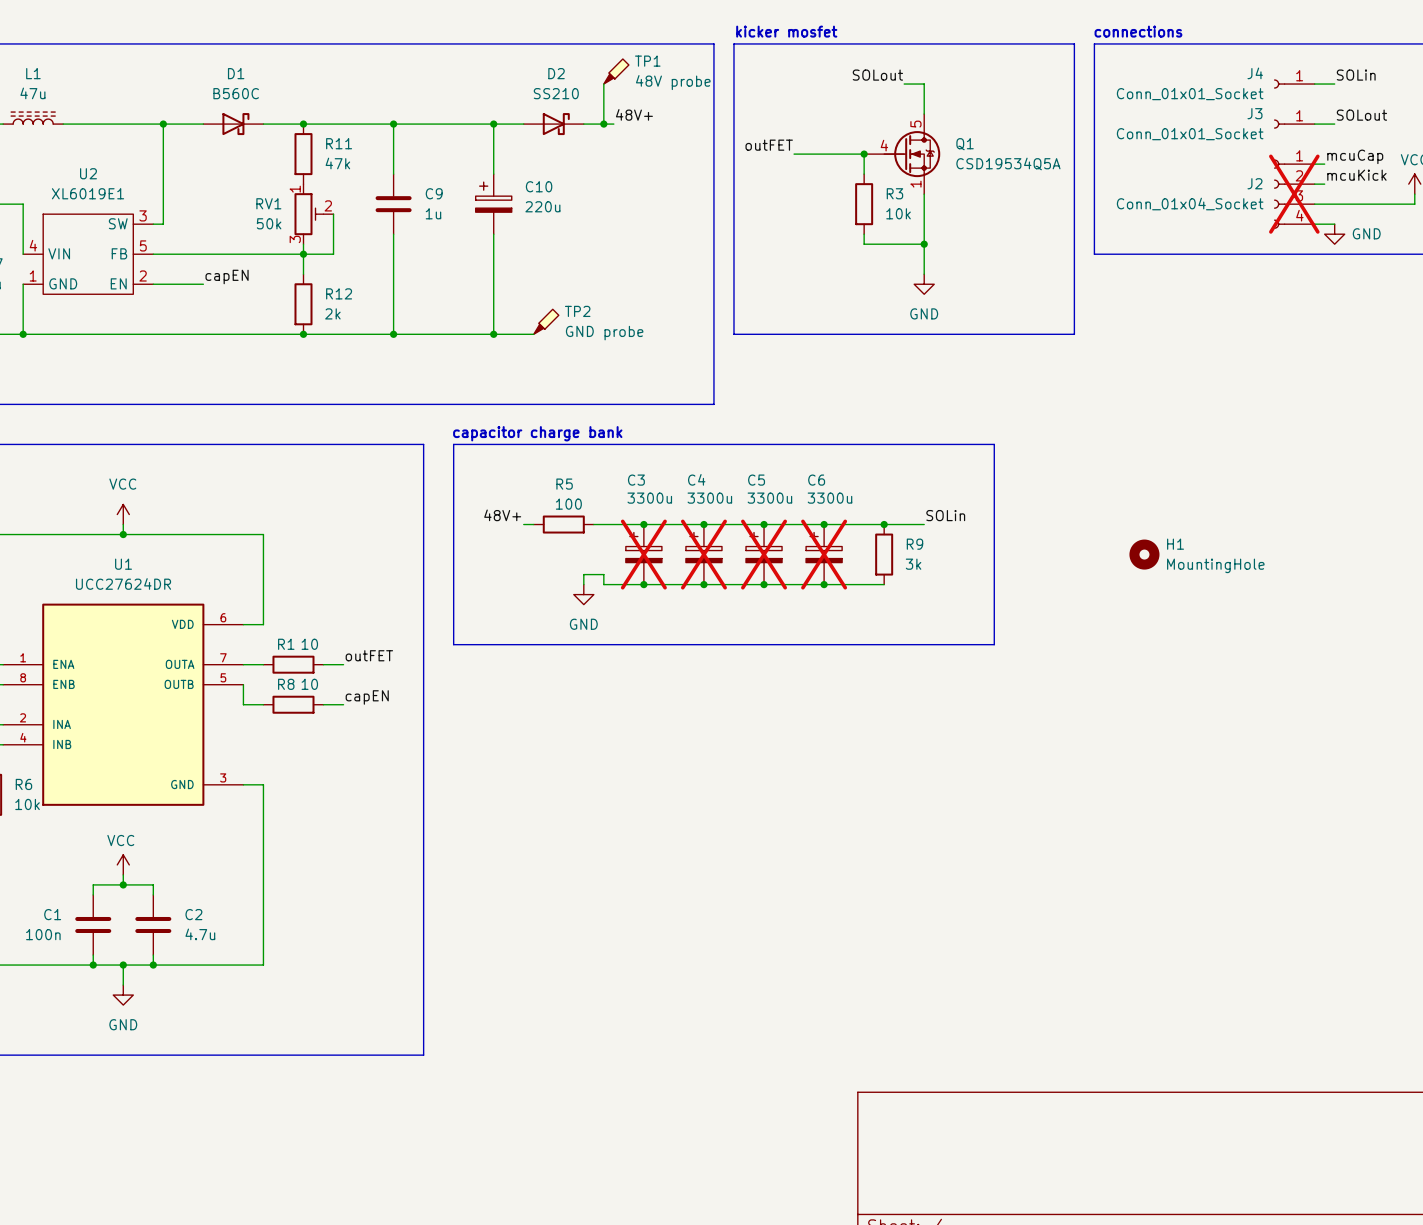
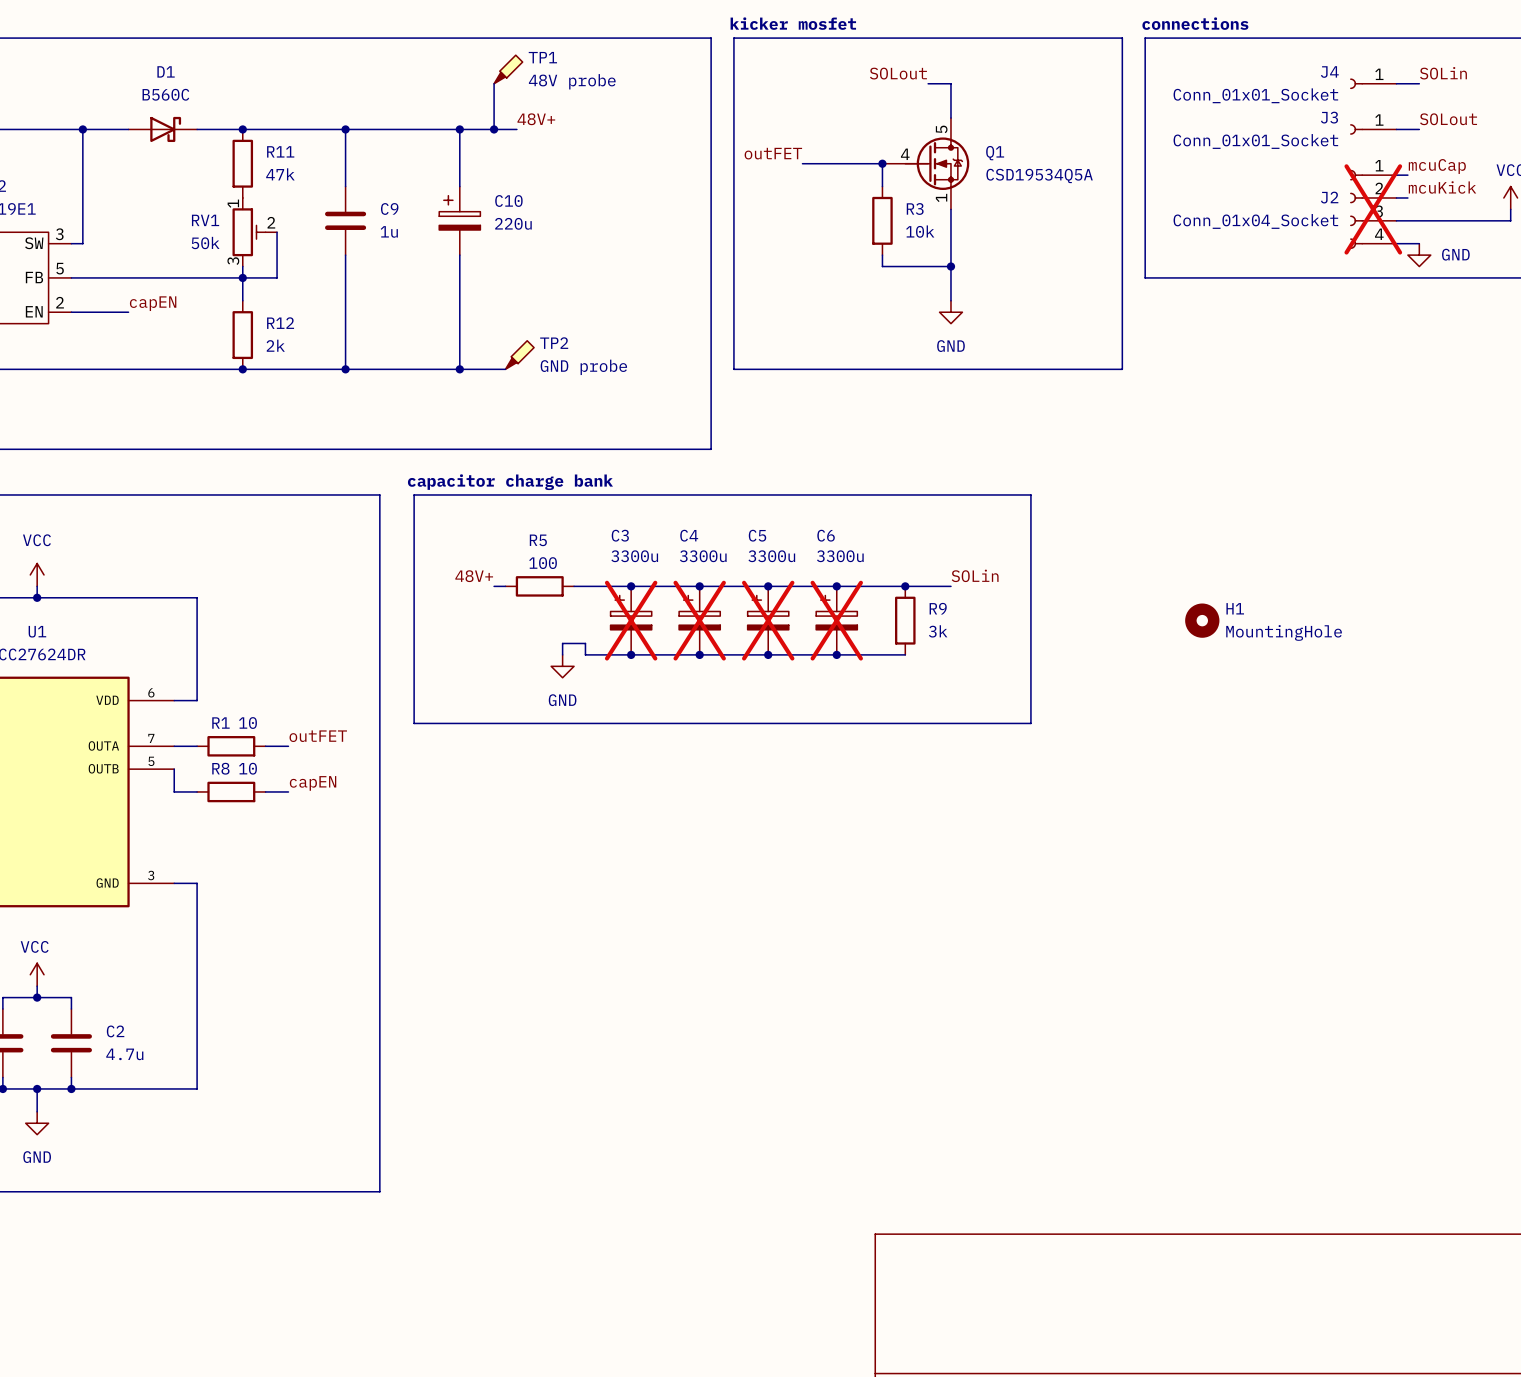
TP1 position: (616, 71) -> (508, 69)
wire: none -> (494, 83) (494, 129) (516, 129)
wire: (603, 84) (603, 124) -> none
label position: 48V+ (634, 114) -> 48V+ (536, 119)
junction: none -> (494, 129)
D2: SS210 (553, 124) -> none
wire: (583, 124) (613, 124) -> none
junction: (603, 124) -> none

